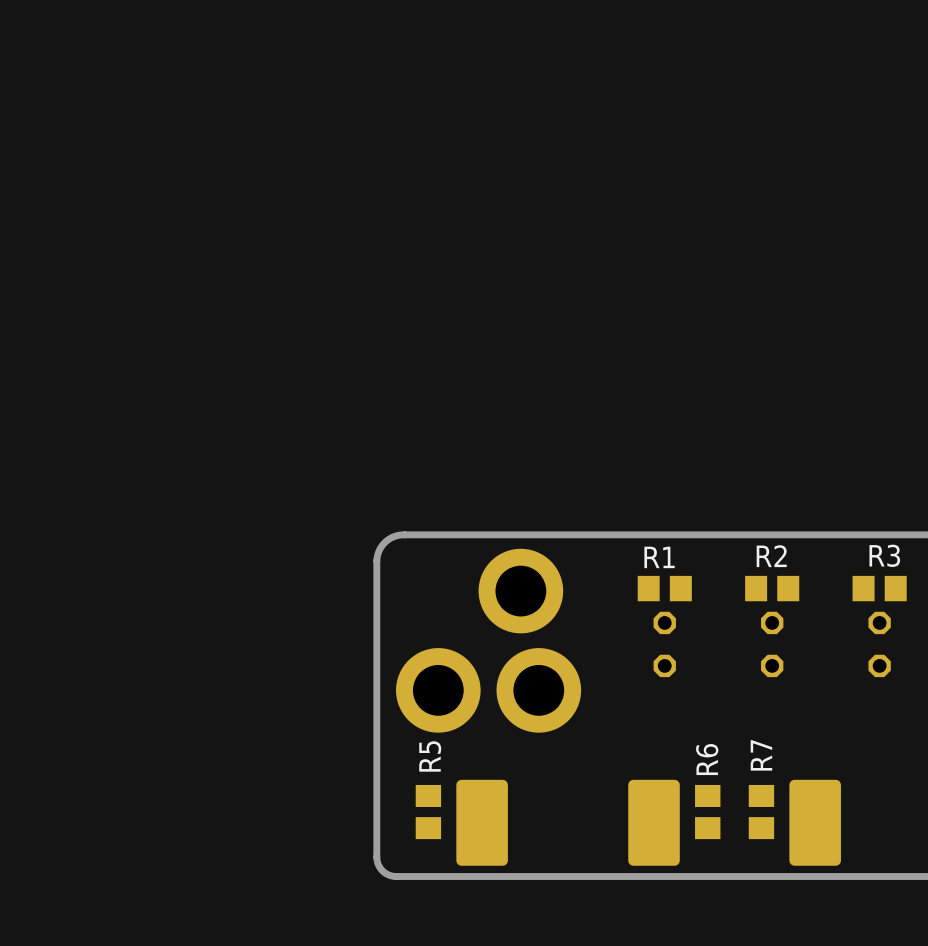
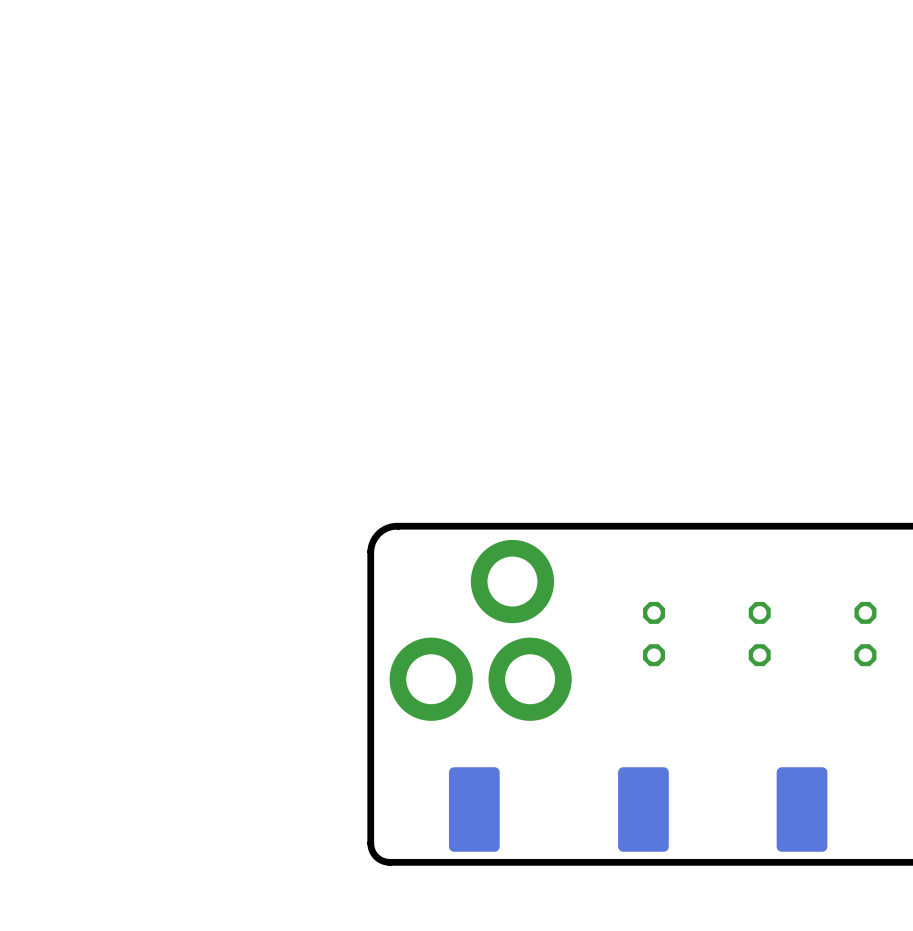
R1: (664, 588) -> none
R2: (772, 588) -> none
R3: (879, 588) -> none
R5: (428, 812) -> none
R6: (707, 812) -> none
R7: (761, 812) -> none

